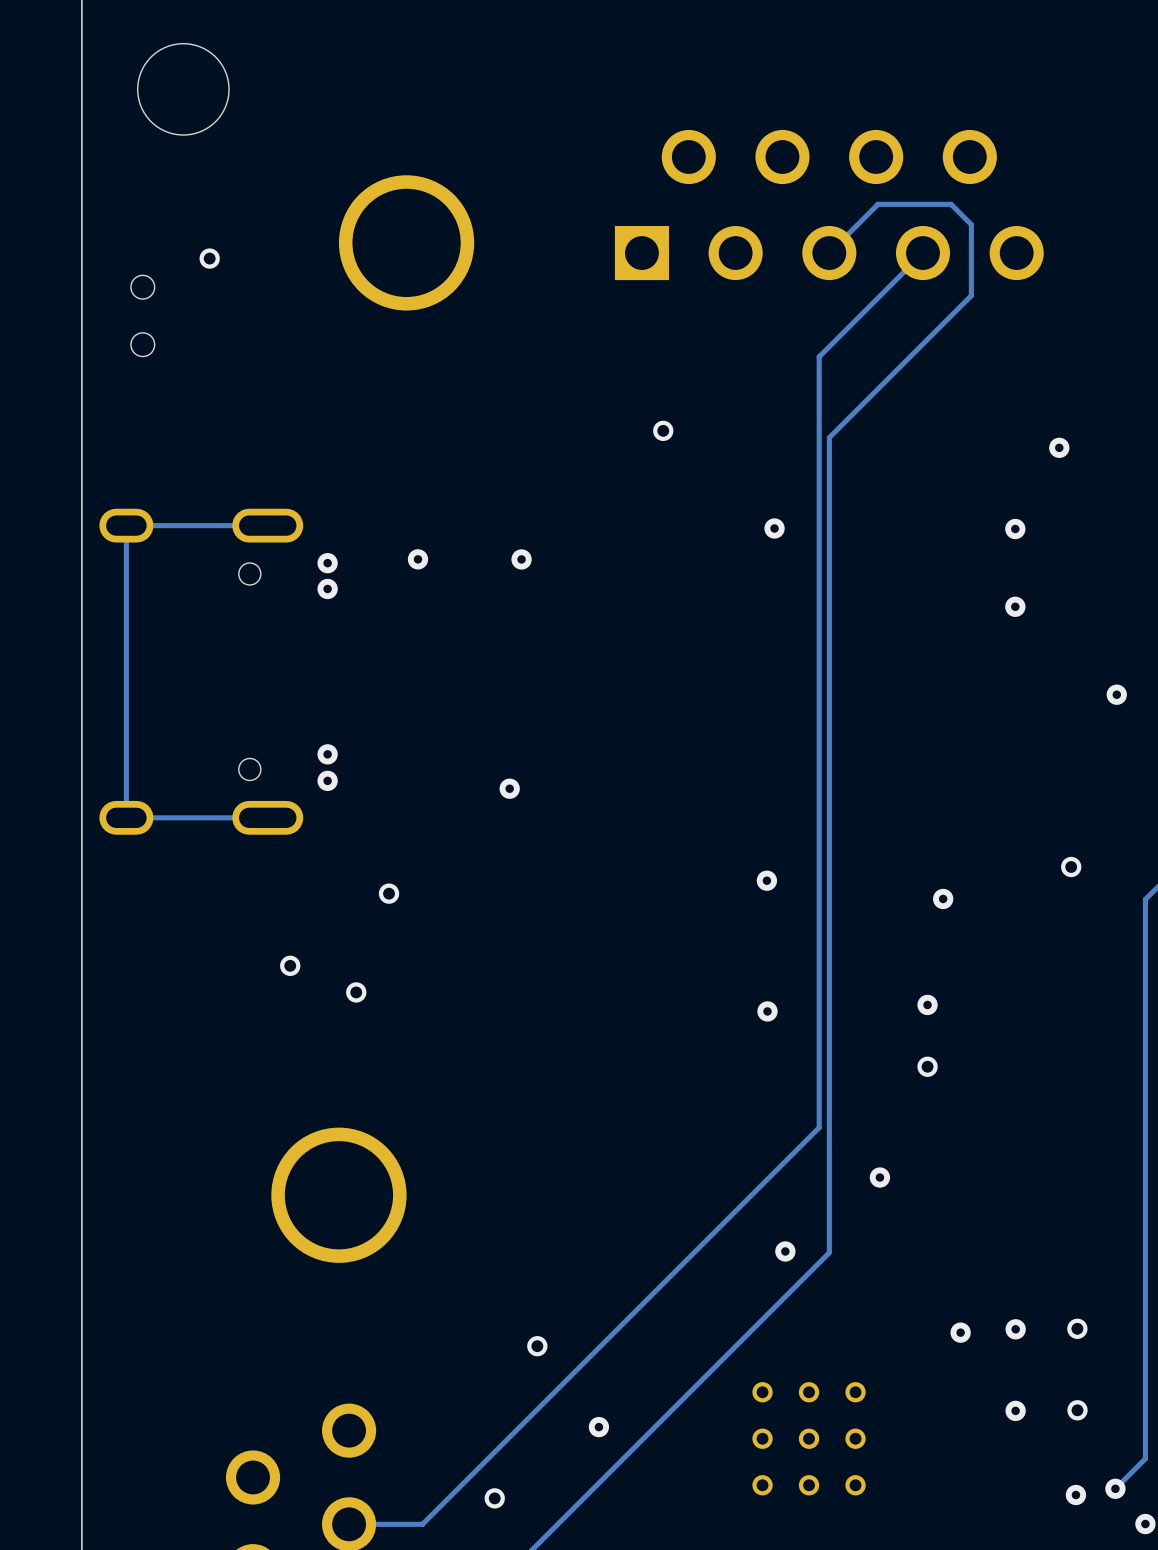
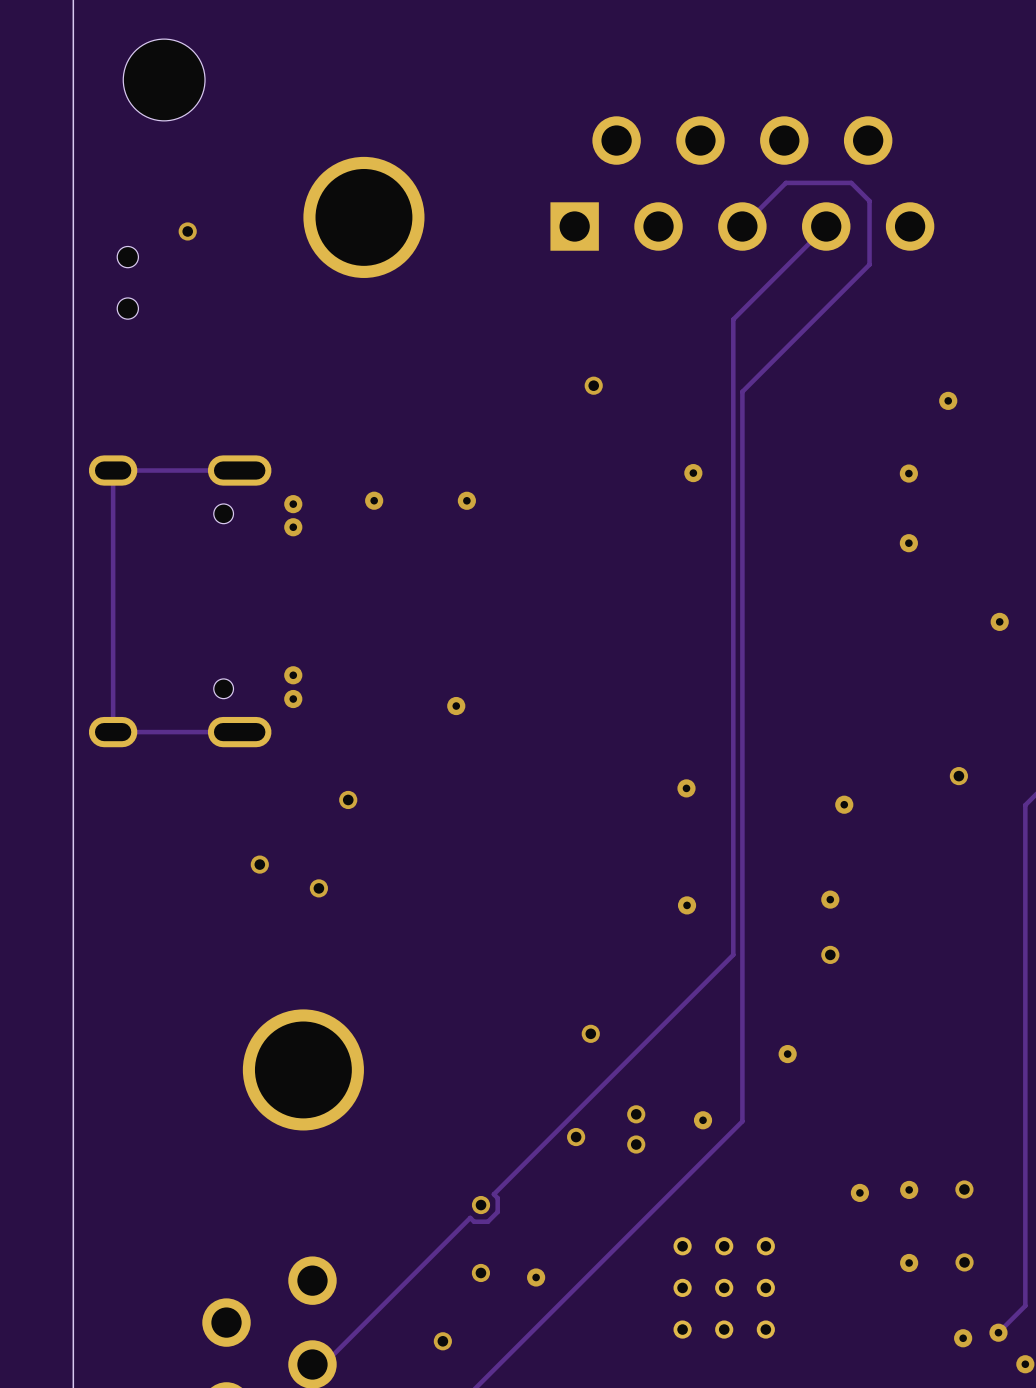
track: (819, 1066) (819, 1127) (422, 1524) (349, 1524) -> (733, 954) (493, 1194) (497, 1198) (497, 1211) (487, 1221) (474, 1221) (470, 1217) (323, 1364)
via: none -> (590, 1033)
via: none -> (636, 1114)
via: none -> (576, 1137)
via: none -> (636, 1144)
via: none -> (480, 1272)

